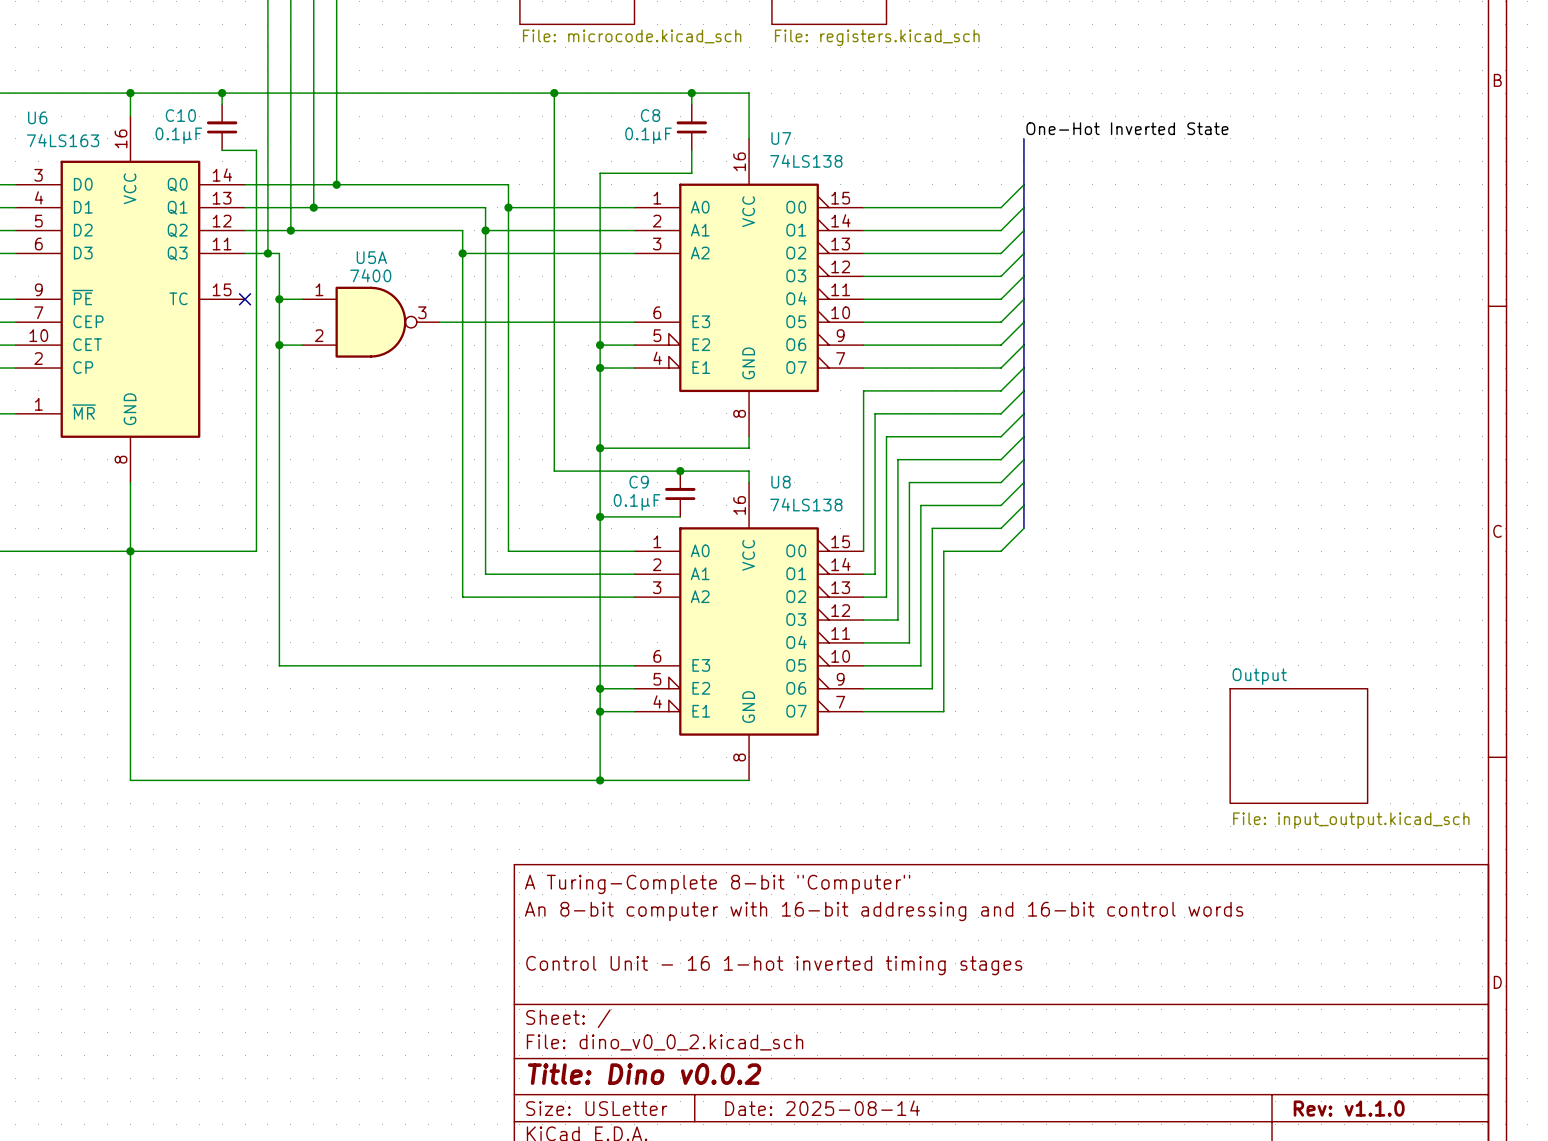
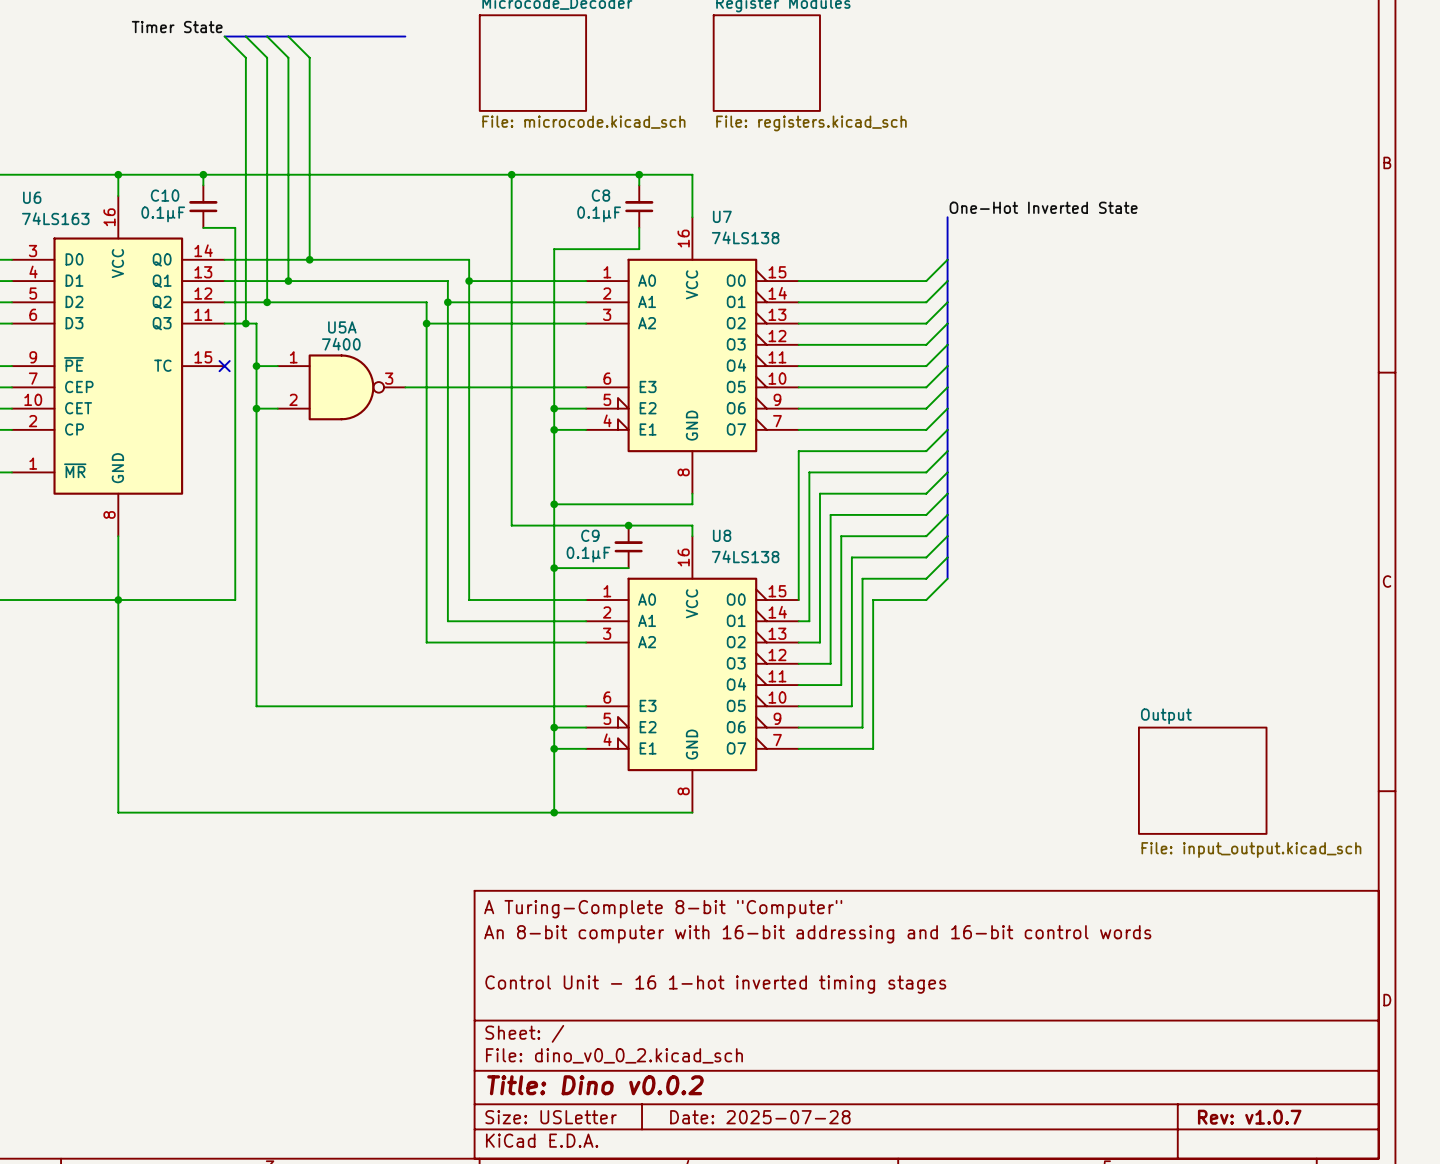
title block: Date: 2025-08-14 (822, 1108) -> Date: 2025-07-28 (760, 1117)
title block: Rev: v1.1.0 (1349, 1108) -> Rev: v1.0.7 (1249, 1117)

